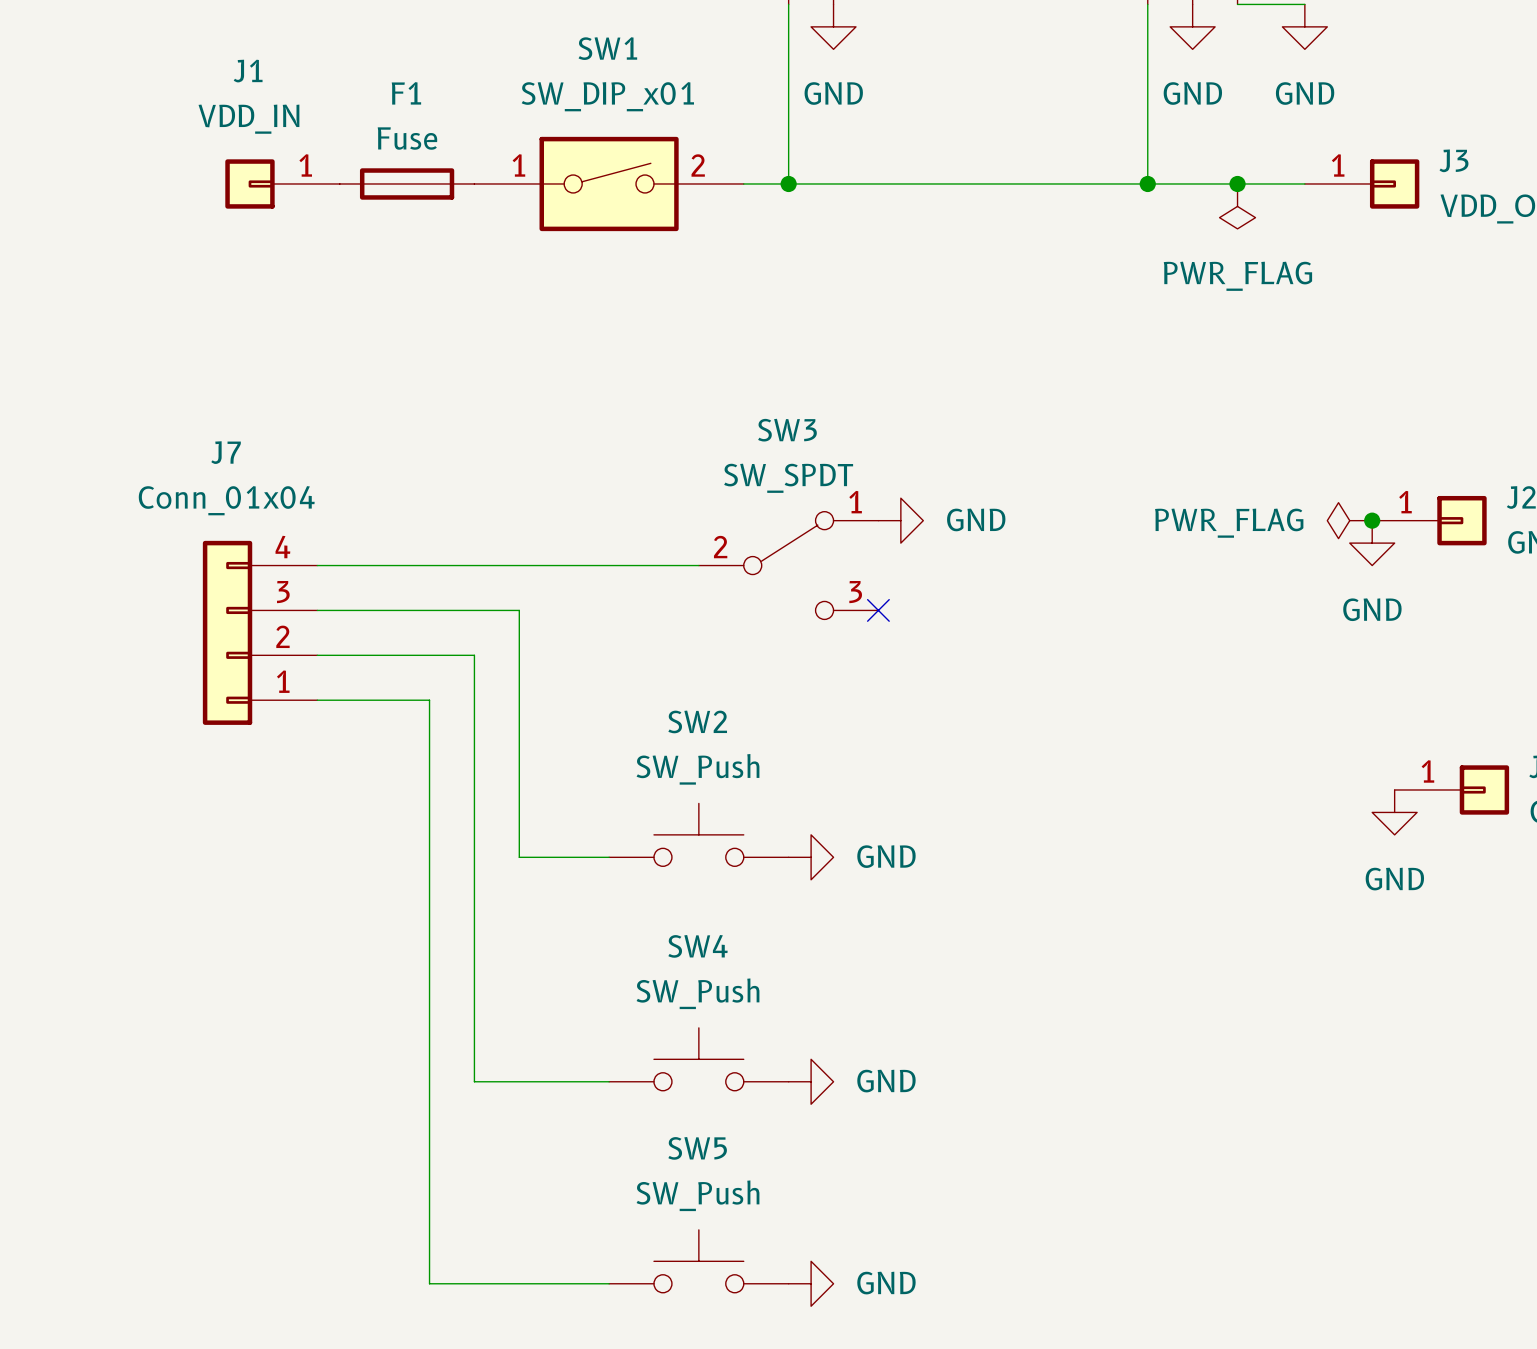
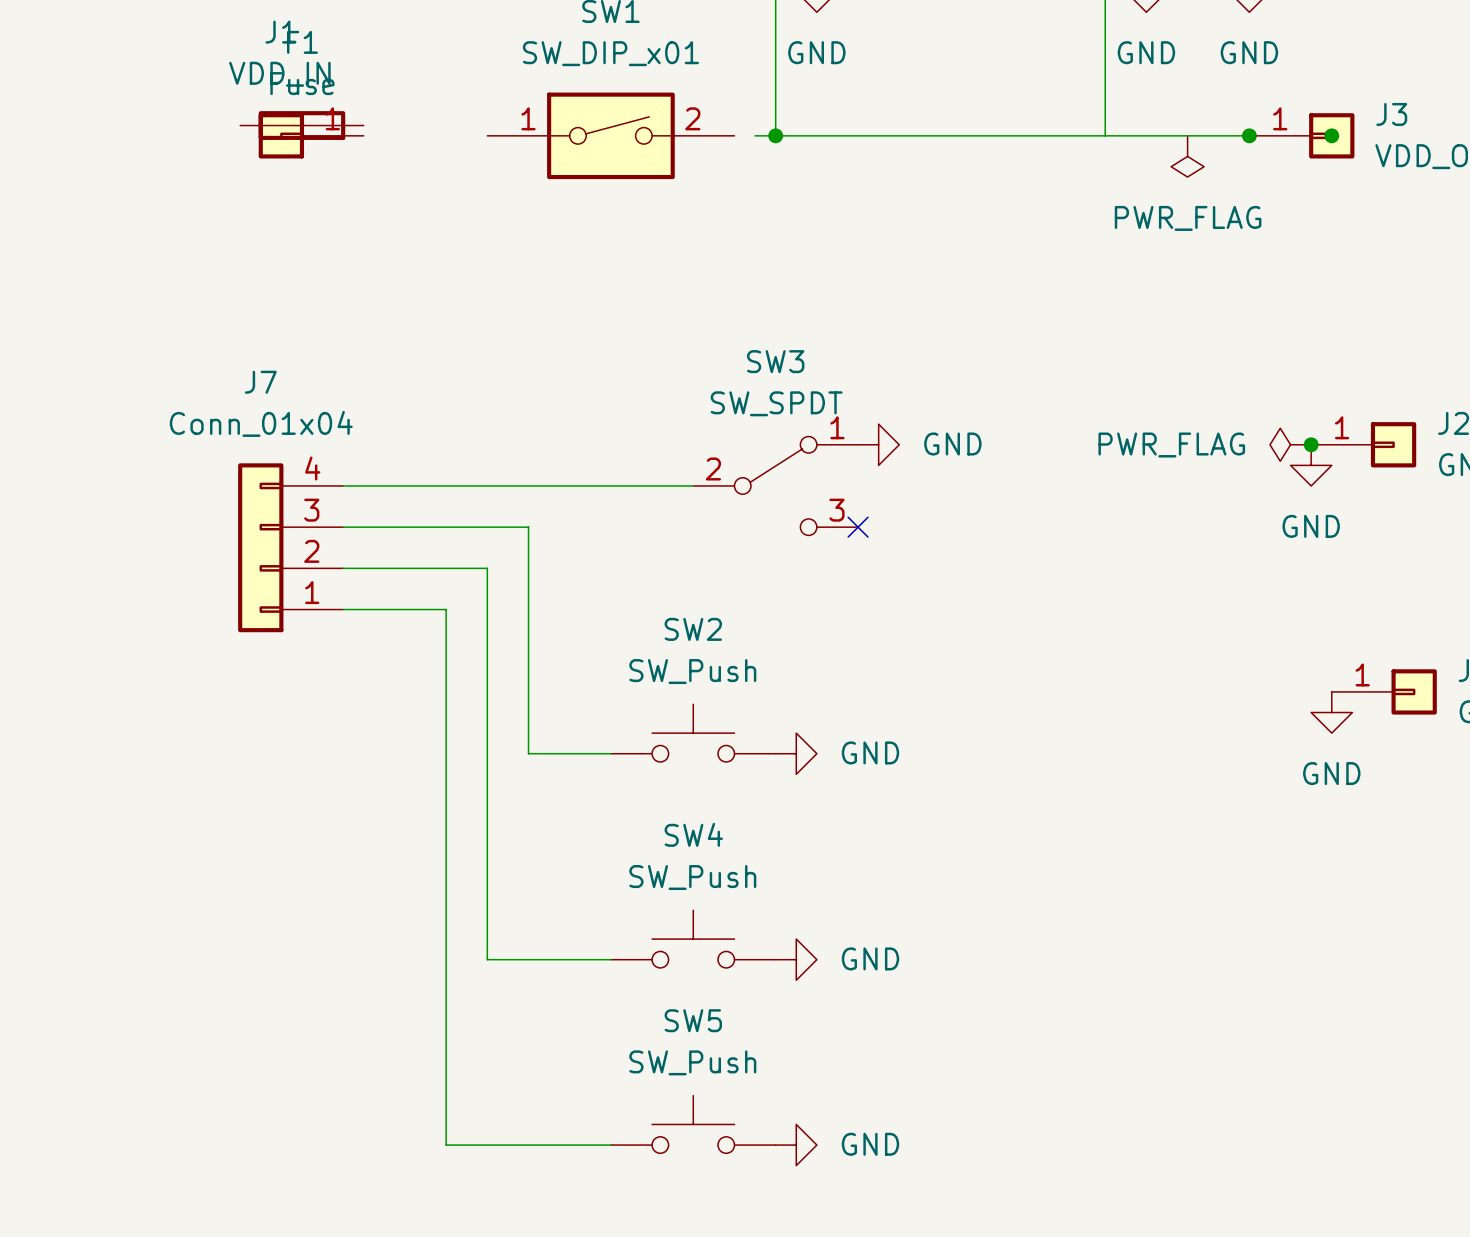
F1 position: (407, 183) -> (301, 125)
wire: (743, 183) (766, 183) -> none
junction: (1147, 183) -> none
junction position: (1237, 183) -> (1249, 135)
junction: none -> (1331, 135)

